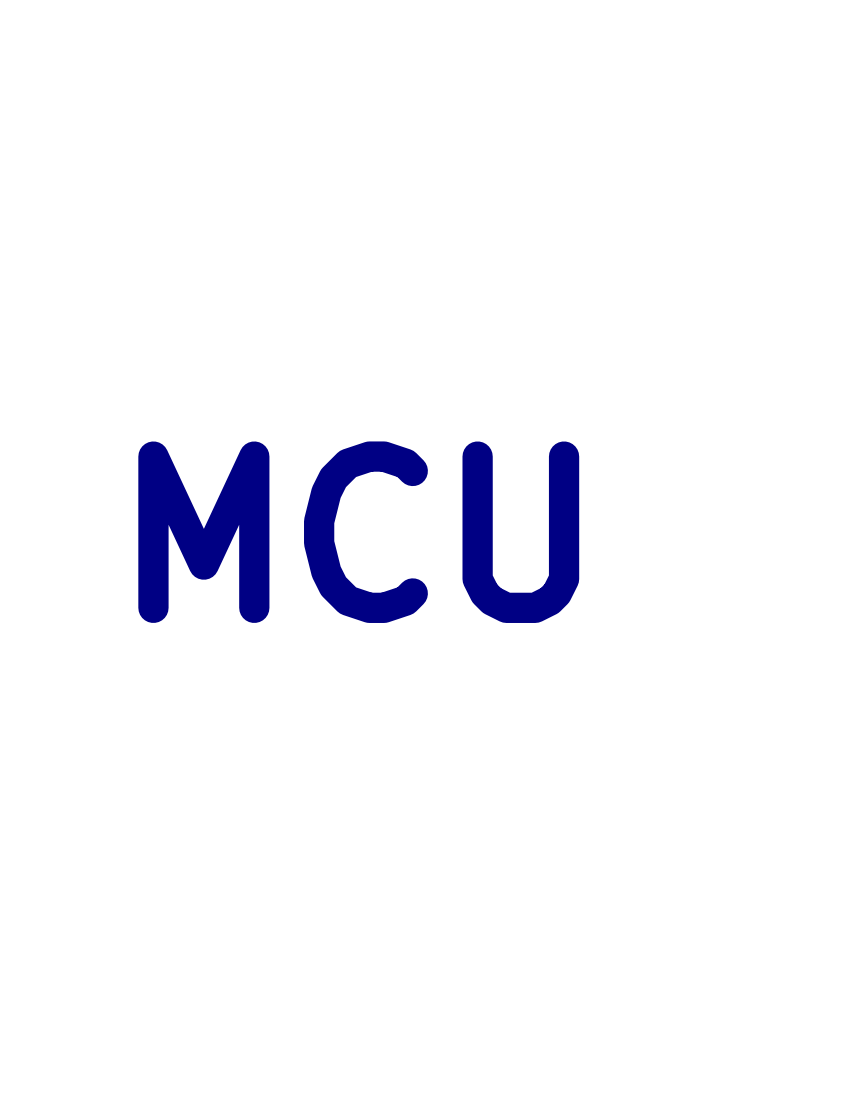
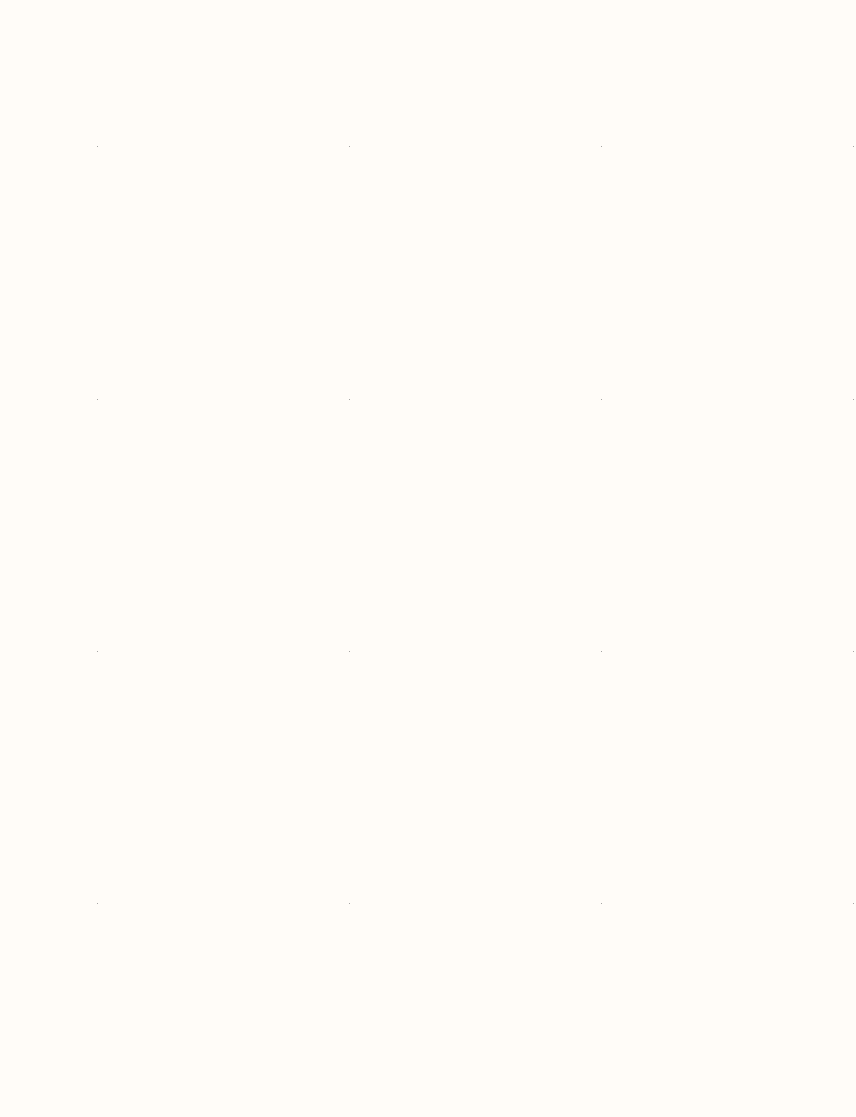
text: MCU (358, 532) -> none

